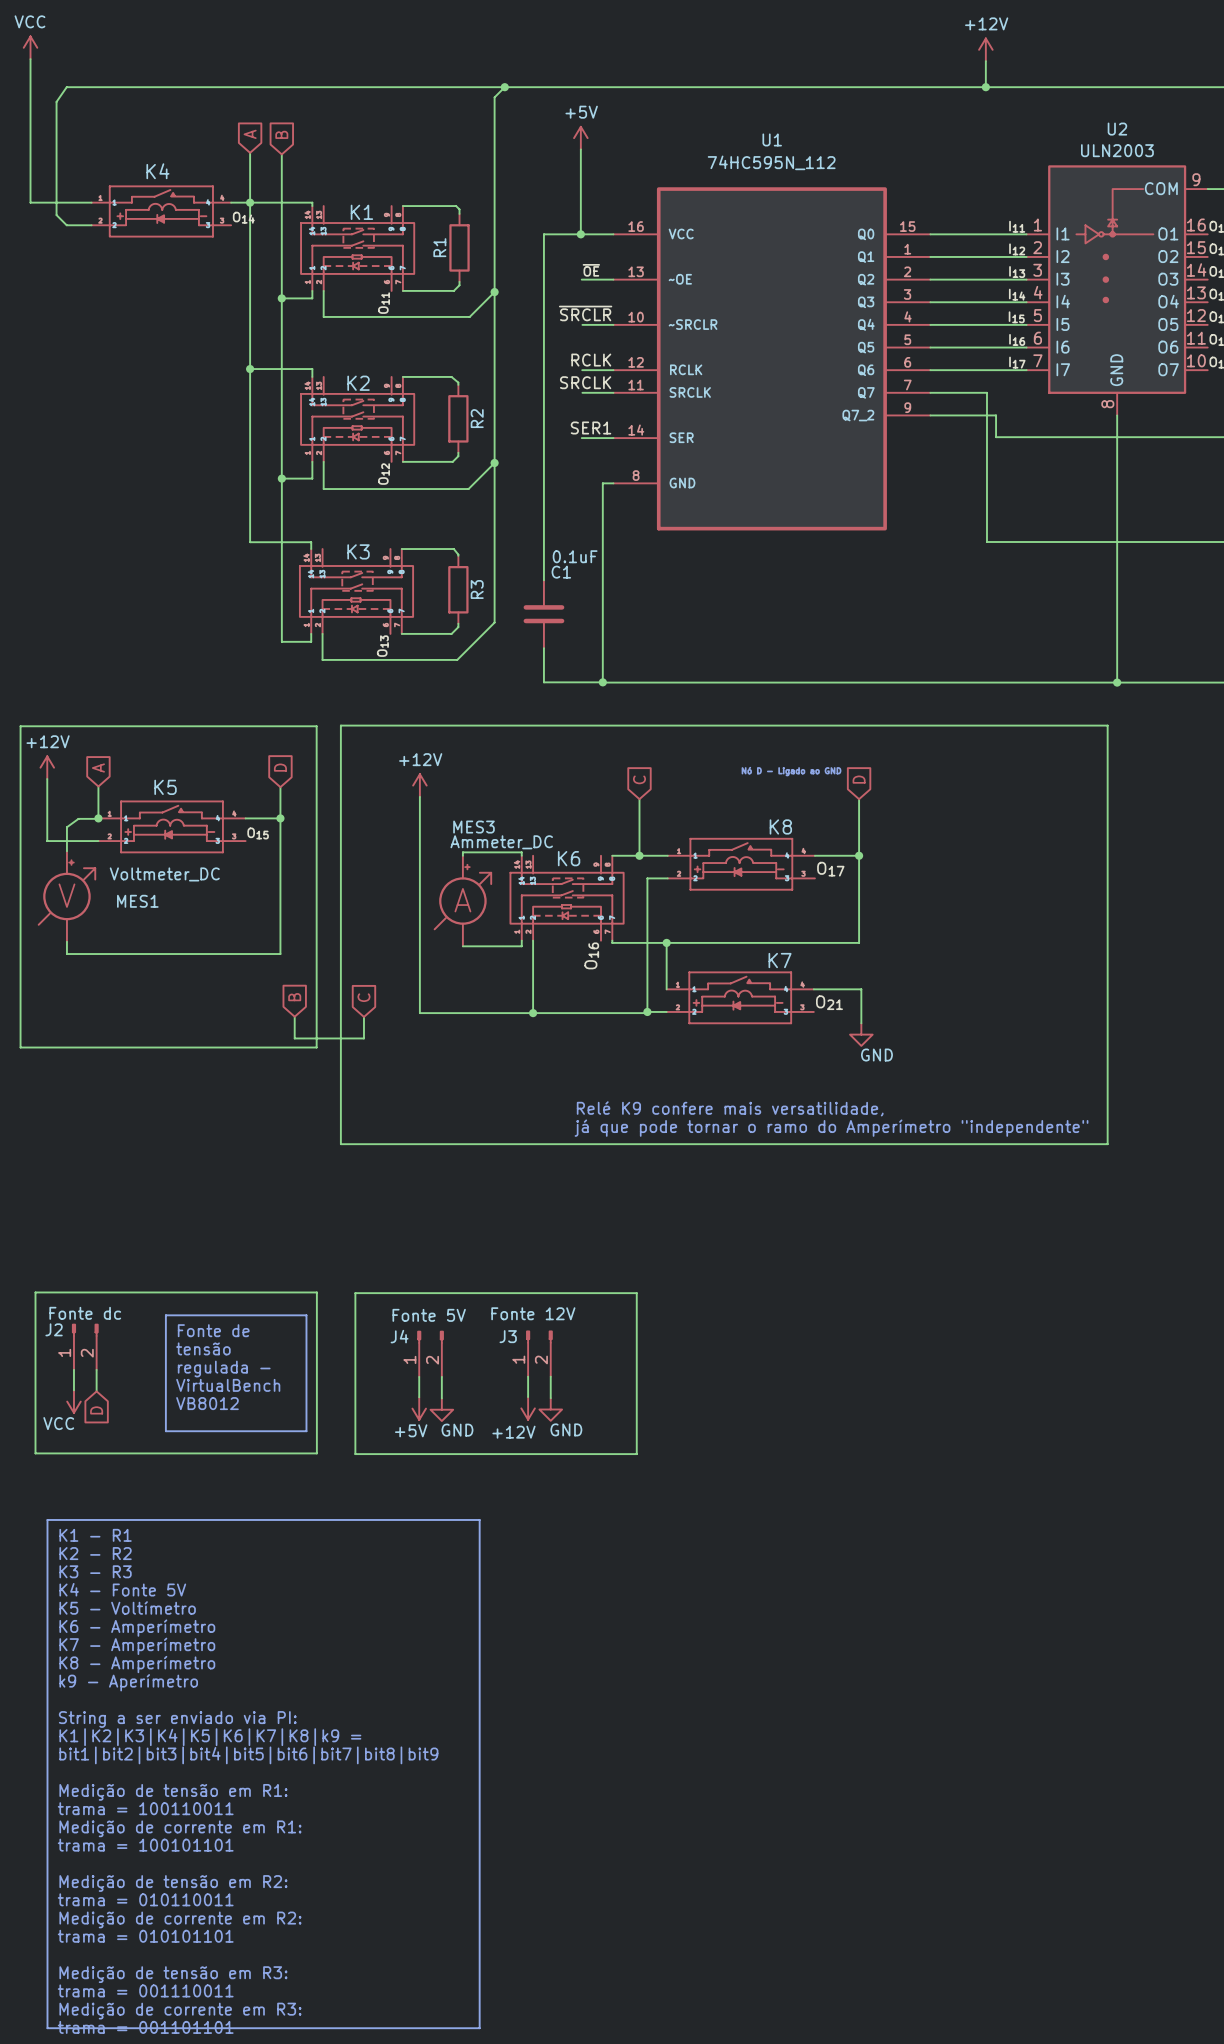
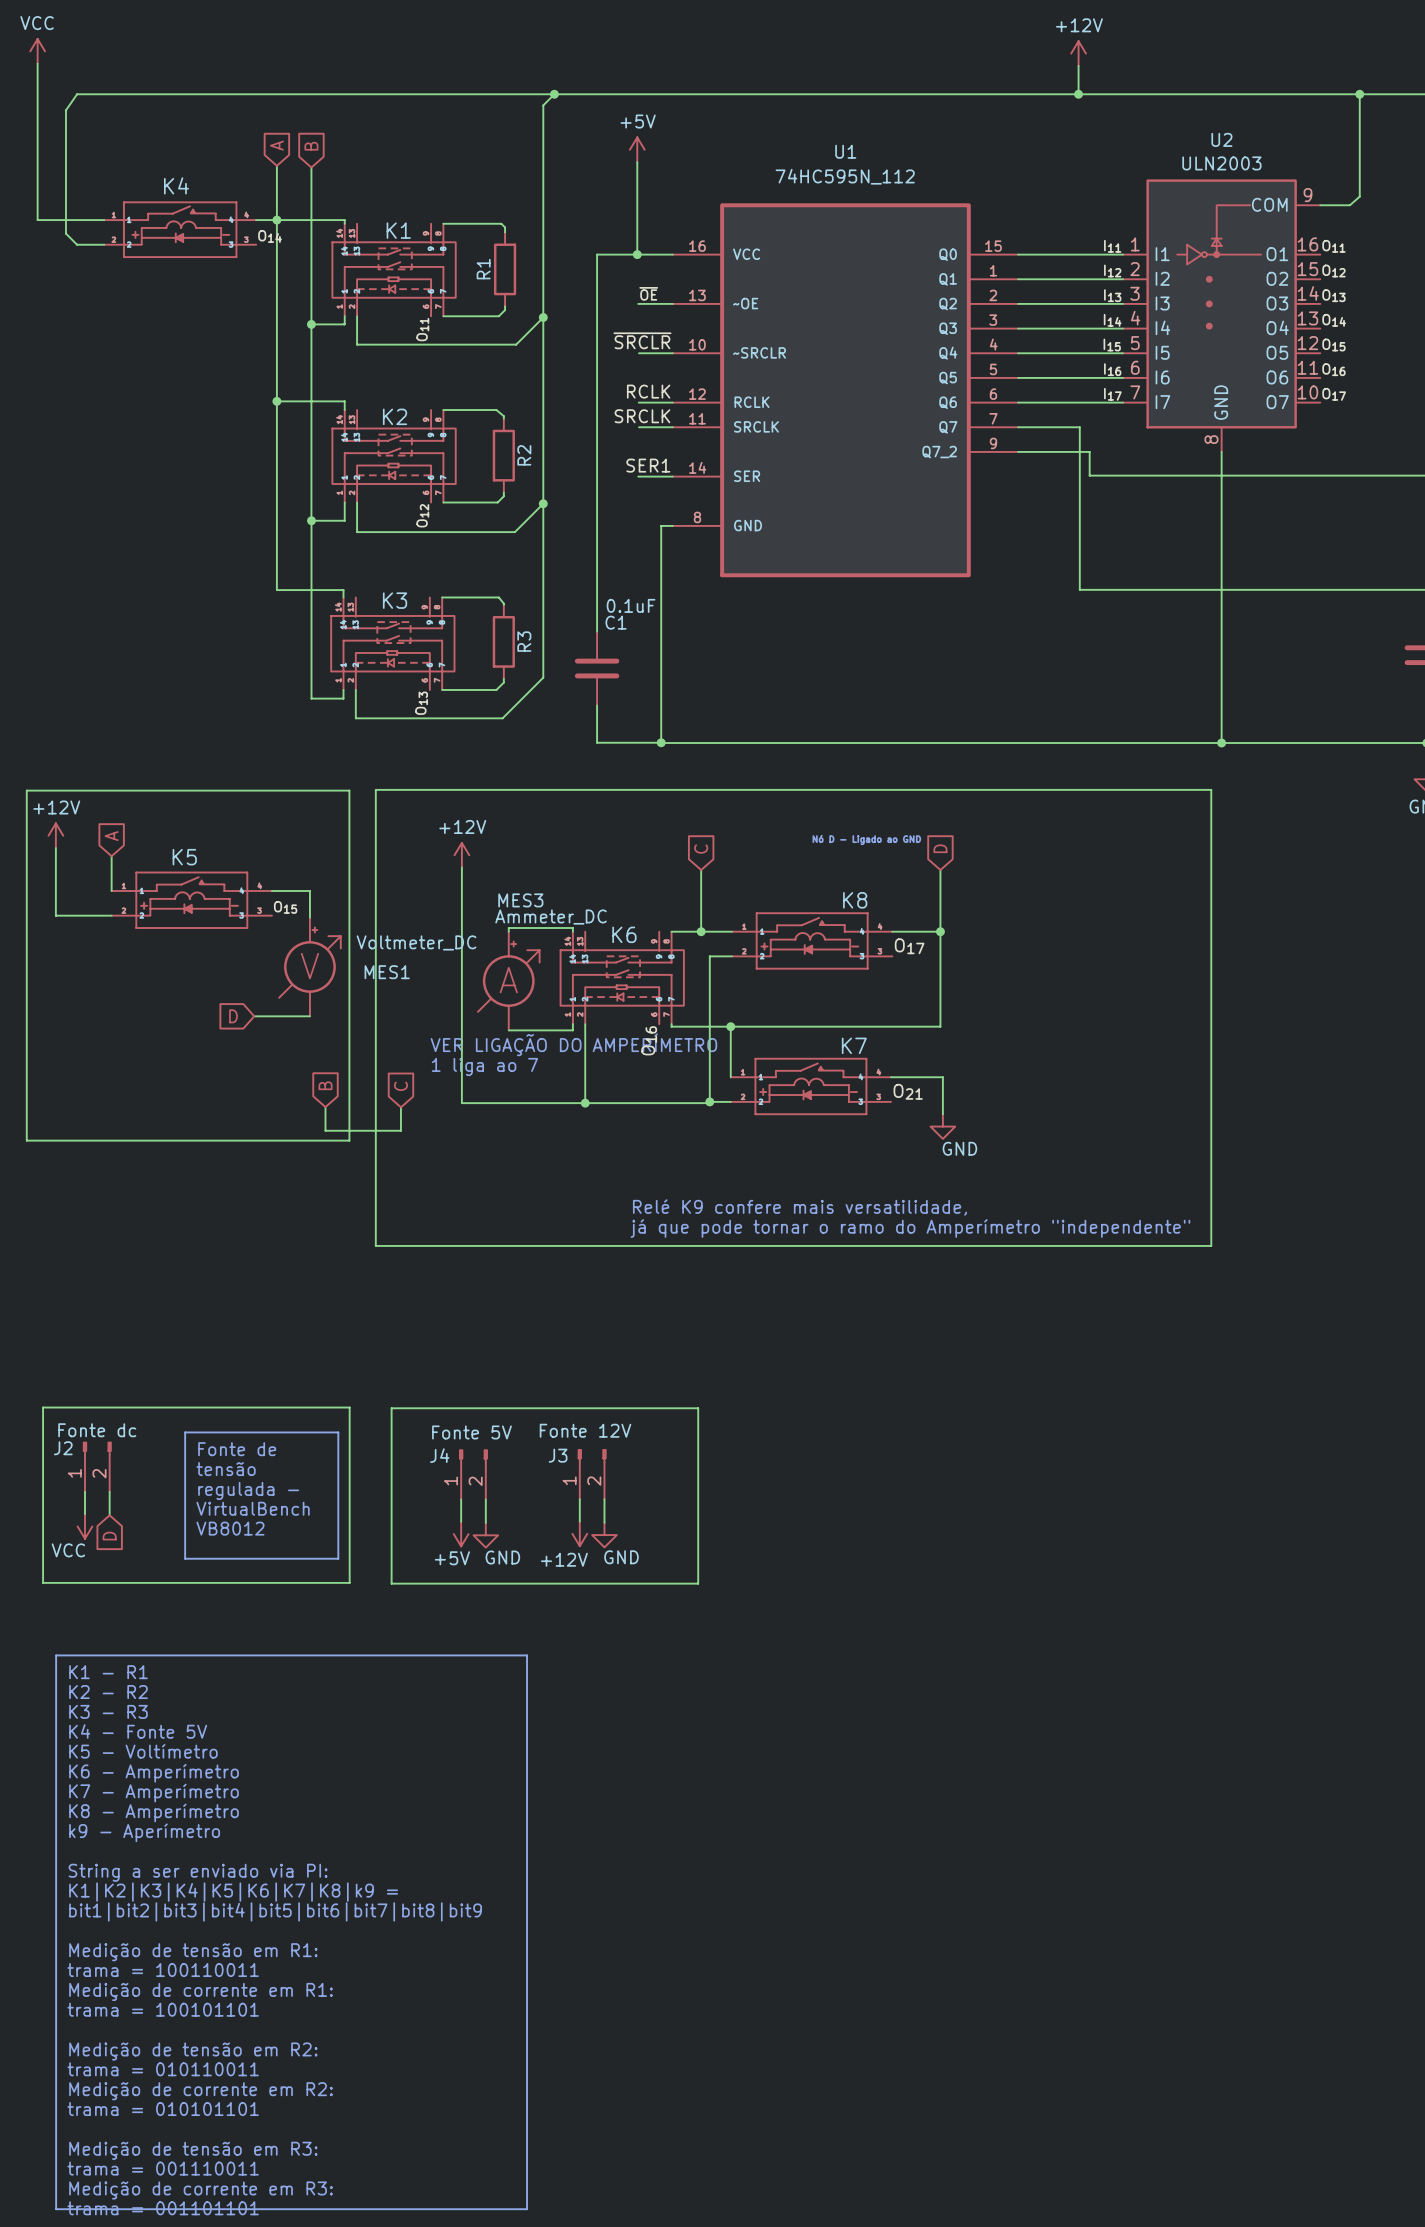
global label rotation: 0° (280, 767) -> 90° counterclockwise (233, 1016)
global label position: D (280, 767) -> D (233, 1016)
wire: (280, 787) (280, 818) -> none
wire: (98, 818) (78, 818) (66, 827) (66, 851) -> none
junction: (98, 818) -> none
junction: (280, 818) -> none
wire: (280, 842) (280, 954) (66, 954) (66, 941) -> none
MES1 position: (66, 896) -> (309, 966)
wire: none -> (254, 1016) (309, 1016)
text: none -> VER LIGAÇÃO DO AMPERÍMETRO (573, 1044)
text: none -> 1 liga ao 7 (484, 1066)

